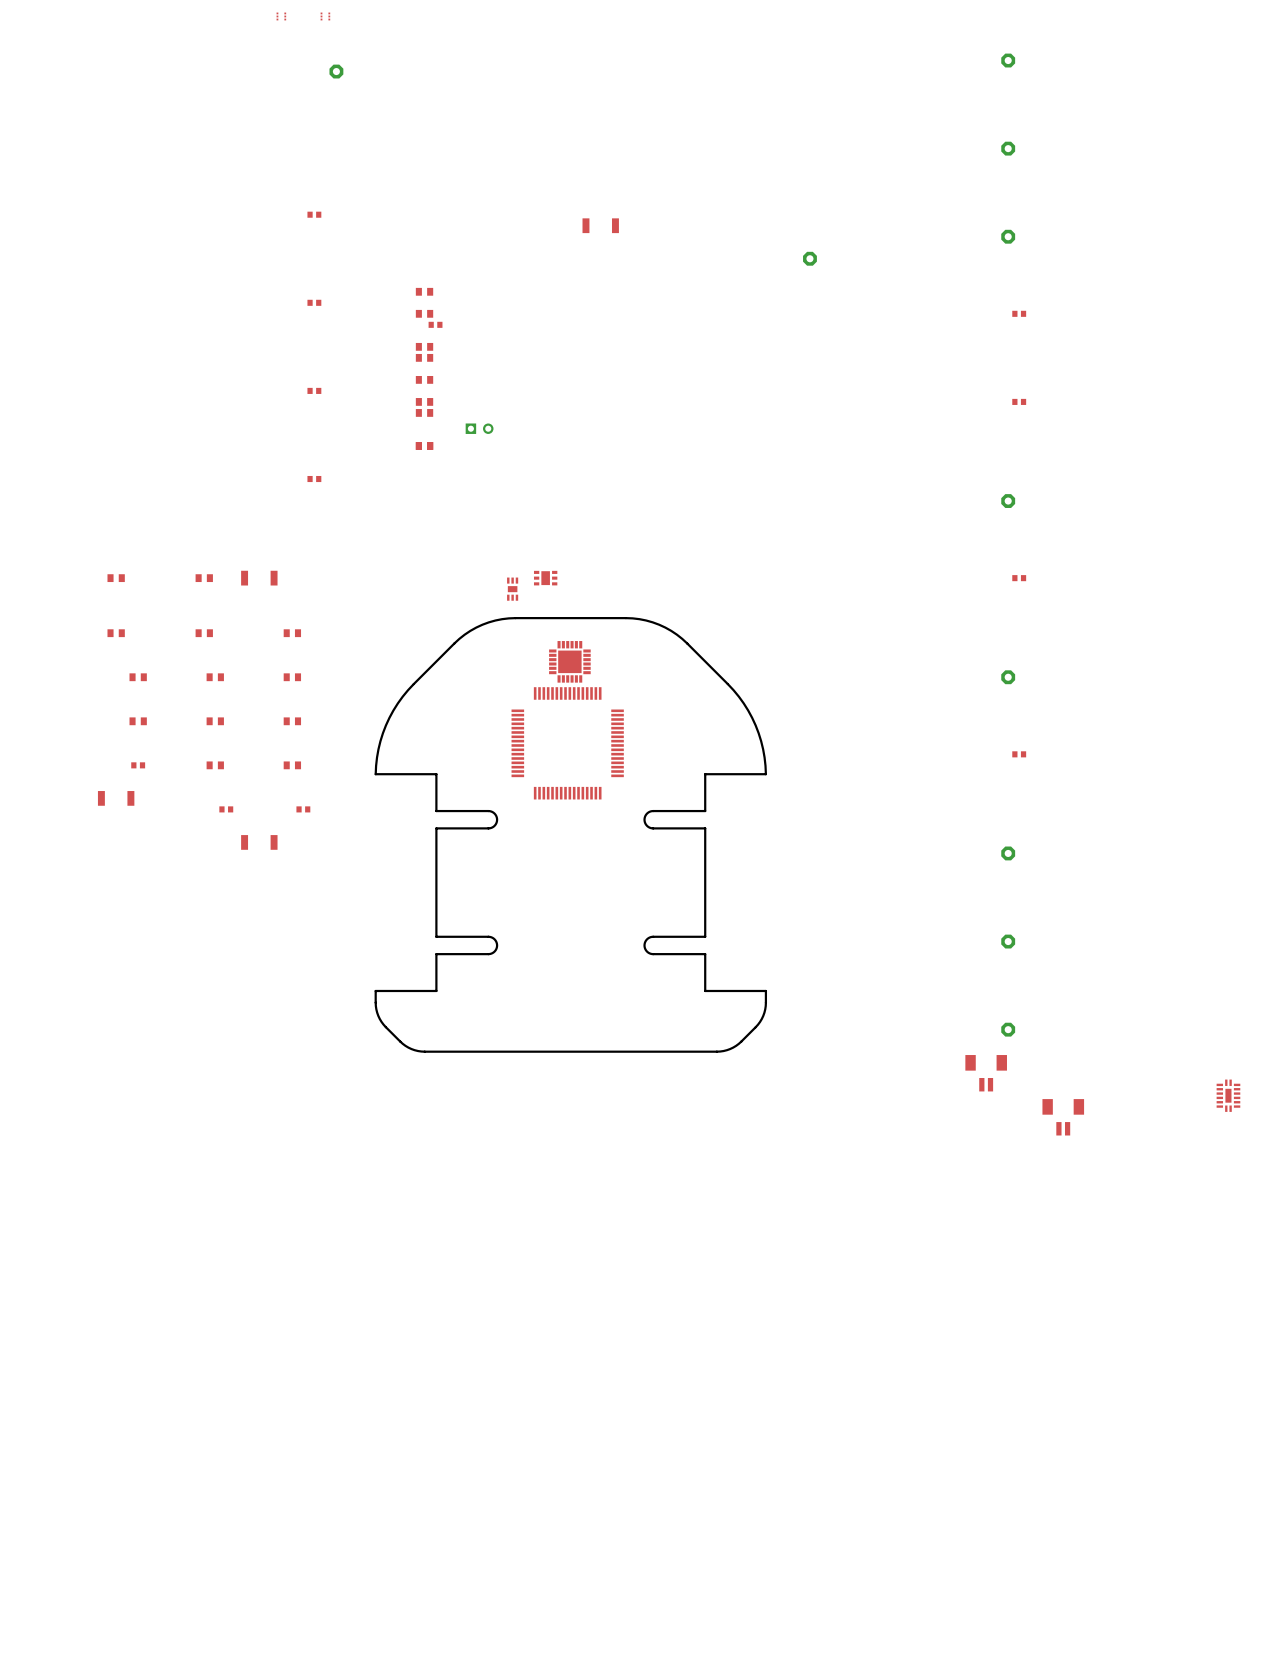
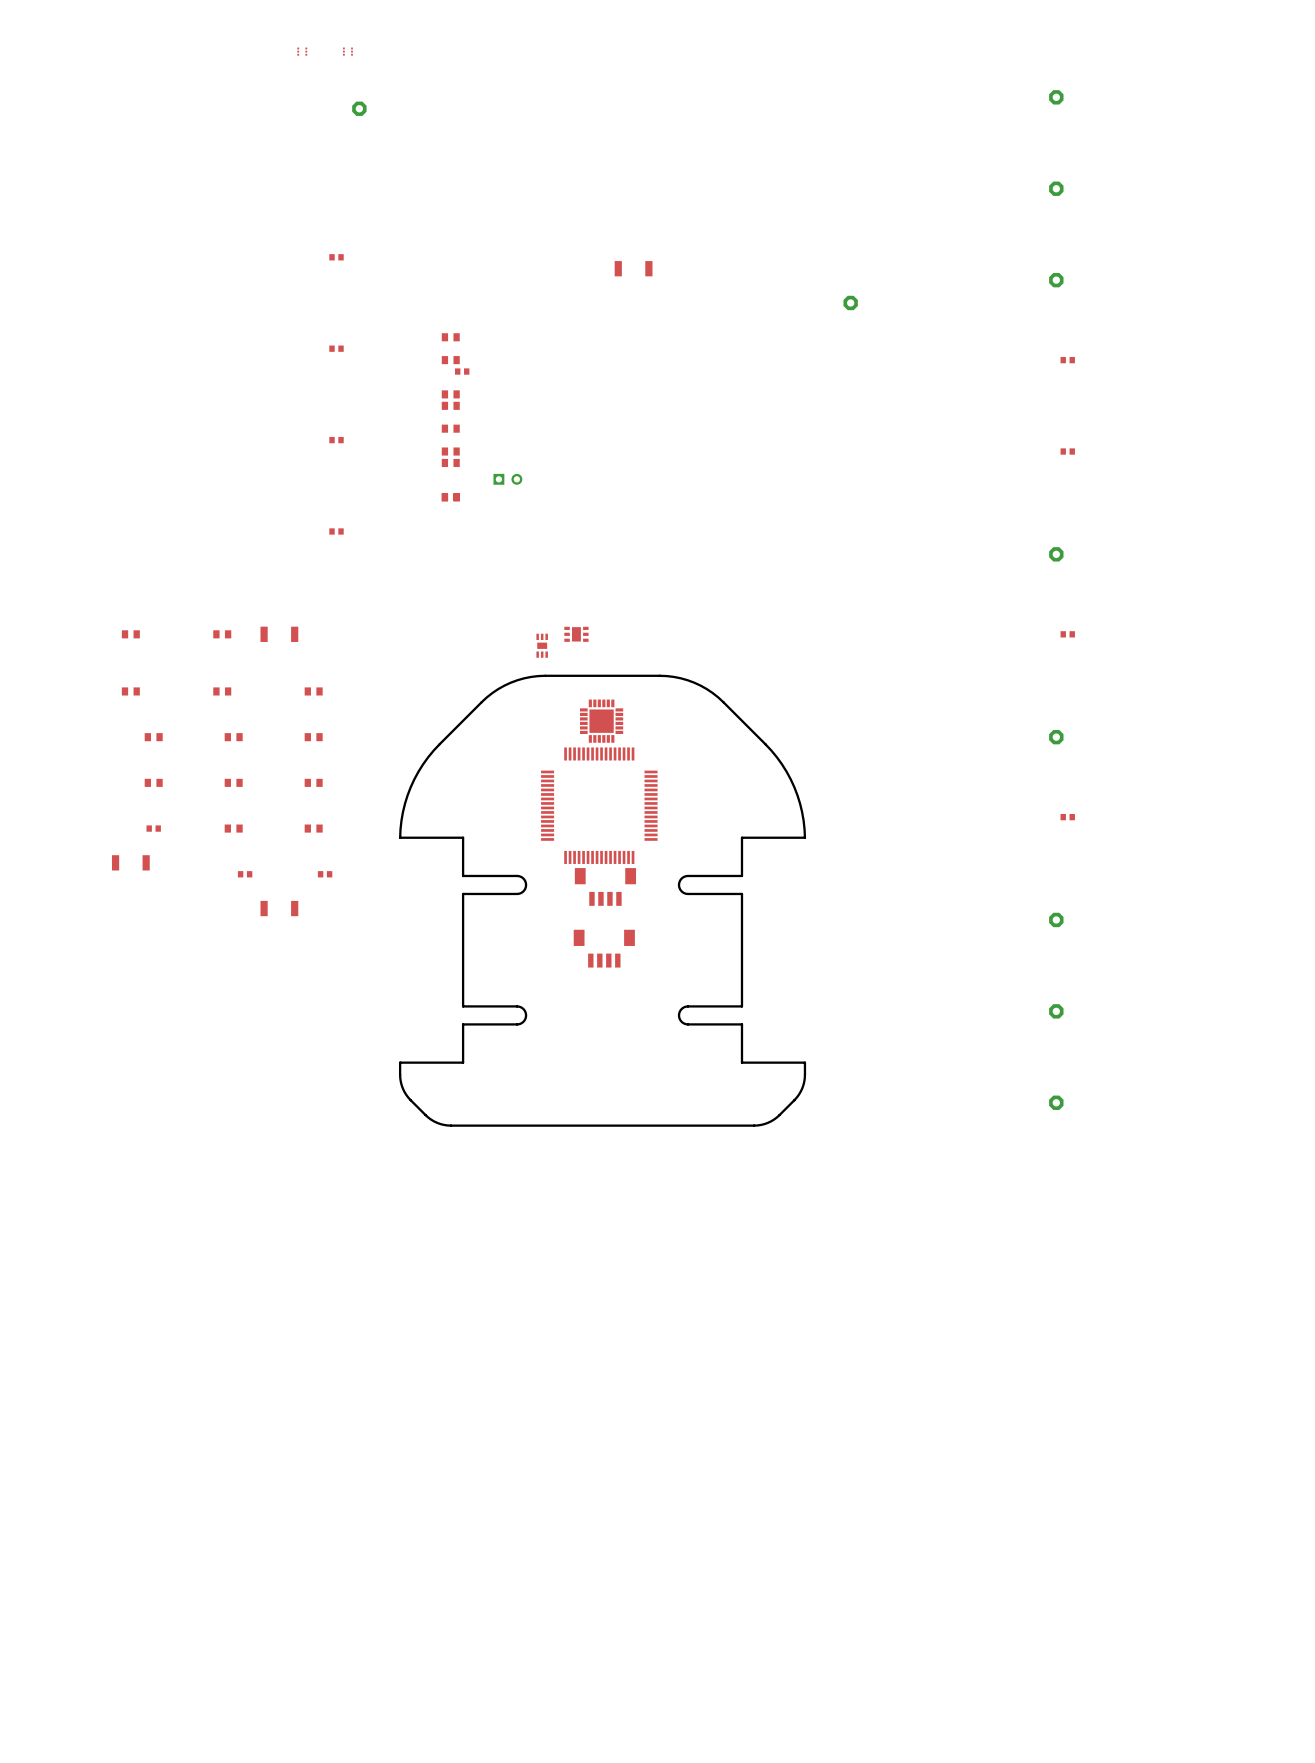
part: none -> (605, 886)
part: none -> (604, 948)
part: (986, 1073) -> none
part: (1228, 1095) -> none
part: (1063, 1117) -> none

